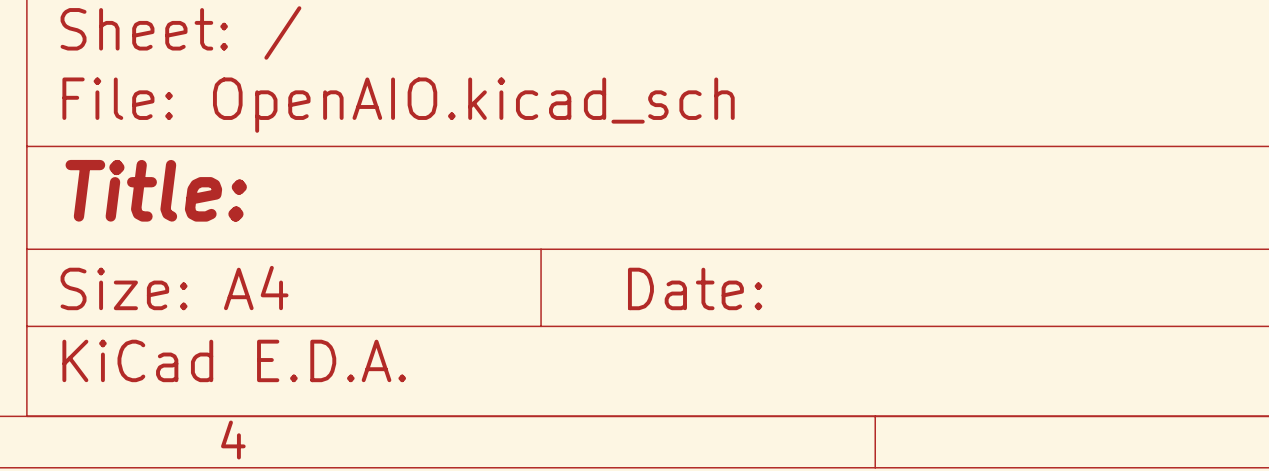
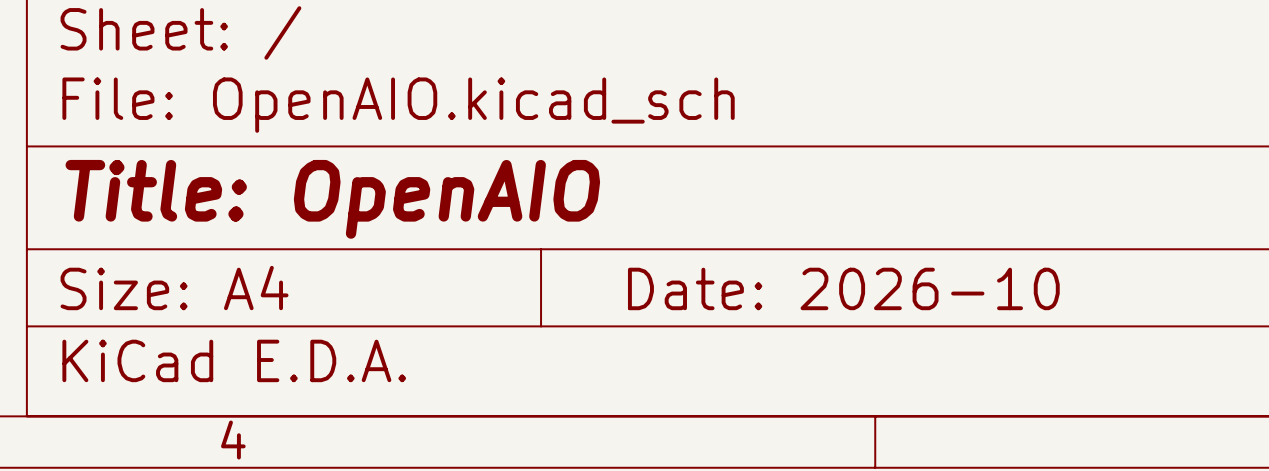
title block: Title: (156, 190) -> Title: OpenAIO (332, 199)
title block: Date: (695, 288) -> Date: 2026-10 (843, 288)

